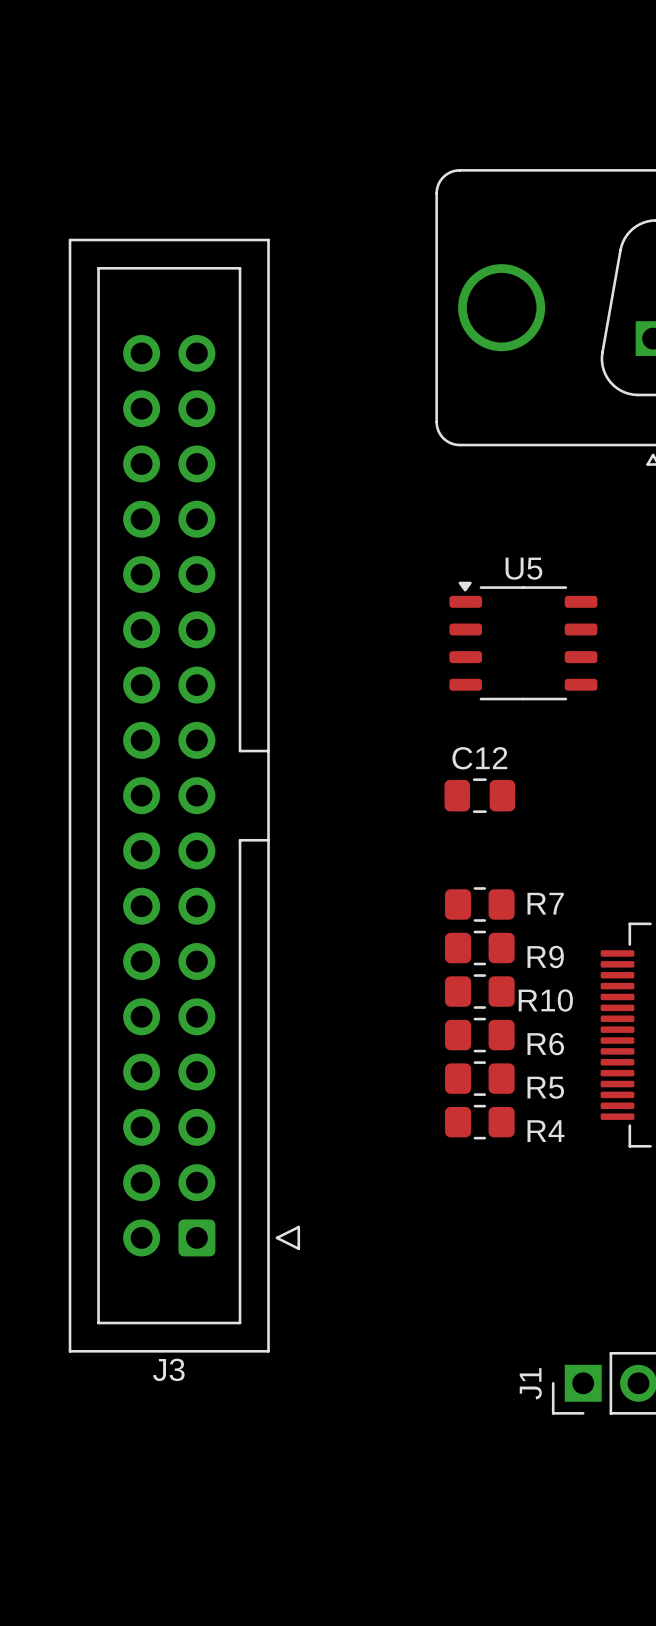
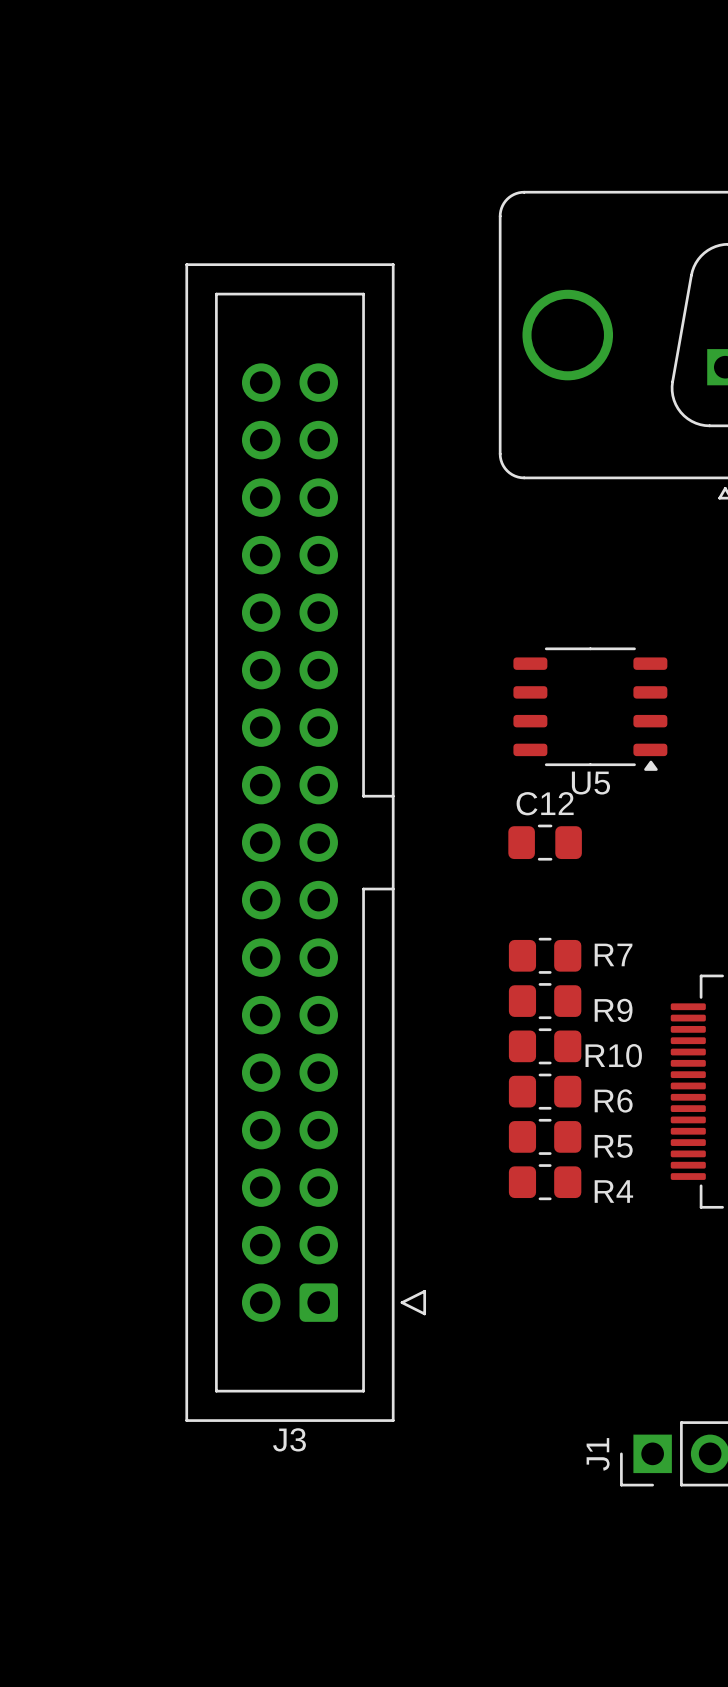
U5 rotation: 0° (523, 641) -> 180° (590, 709)
J3 position: (184, 795) -> (305, 842)

